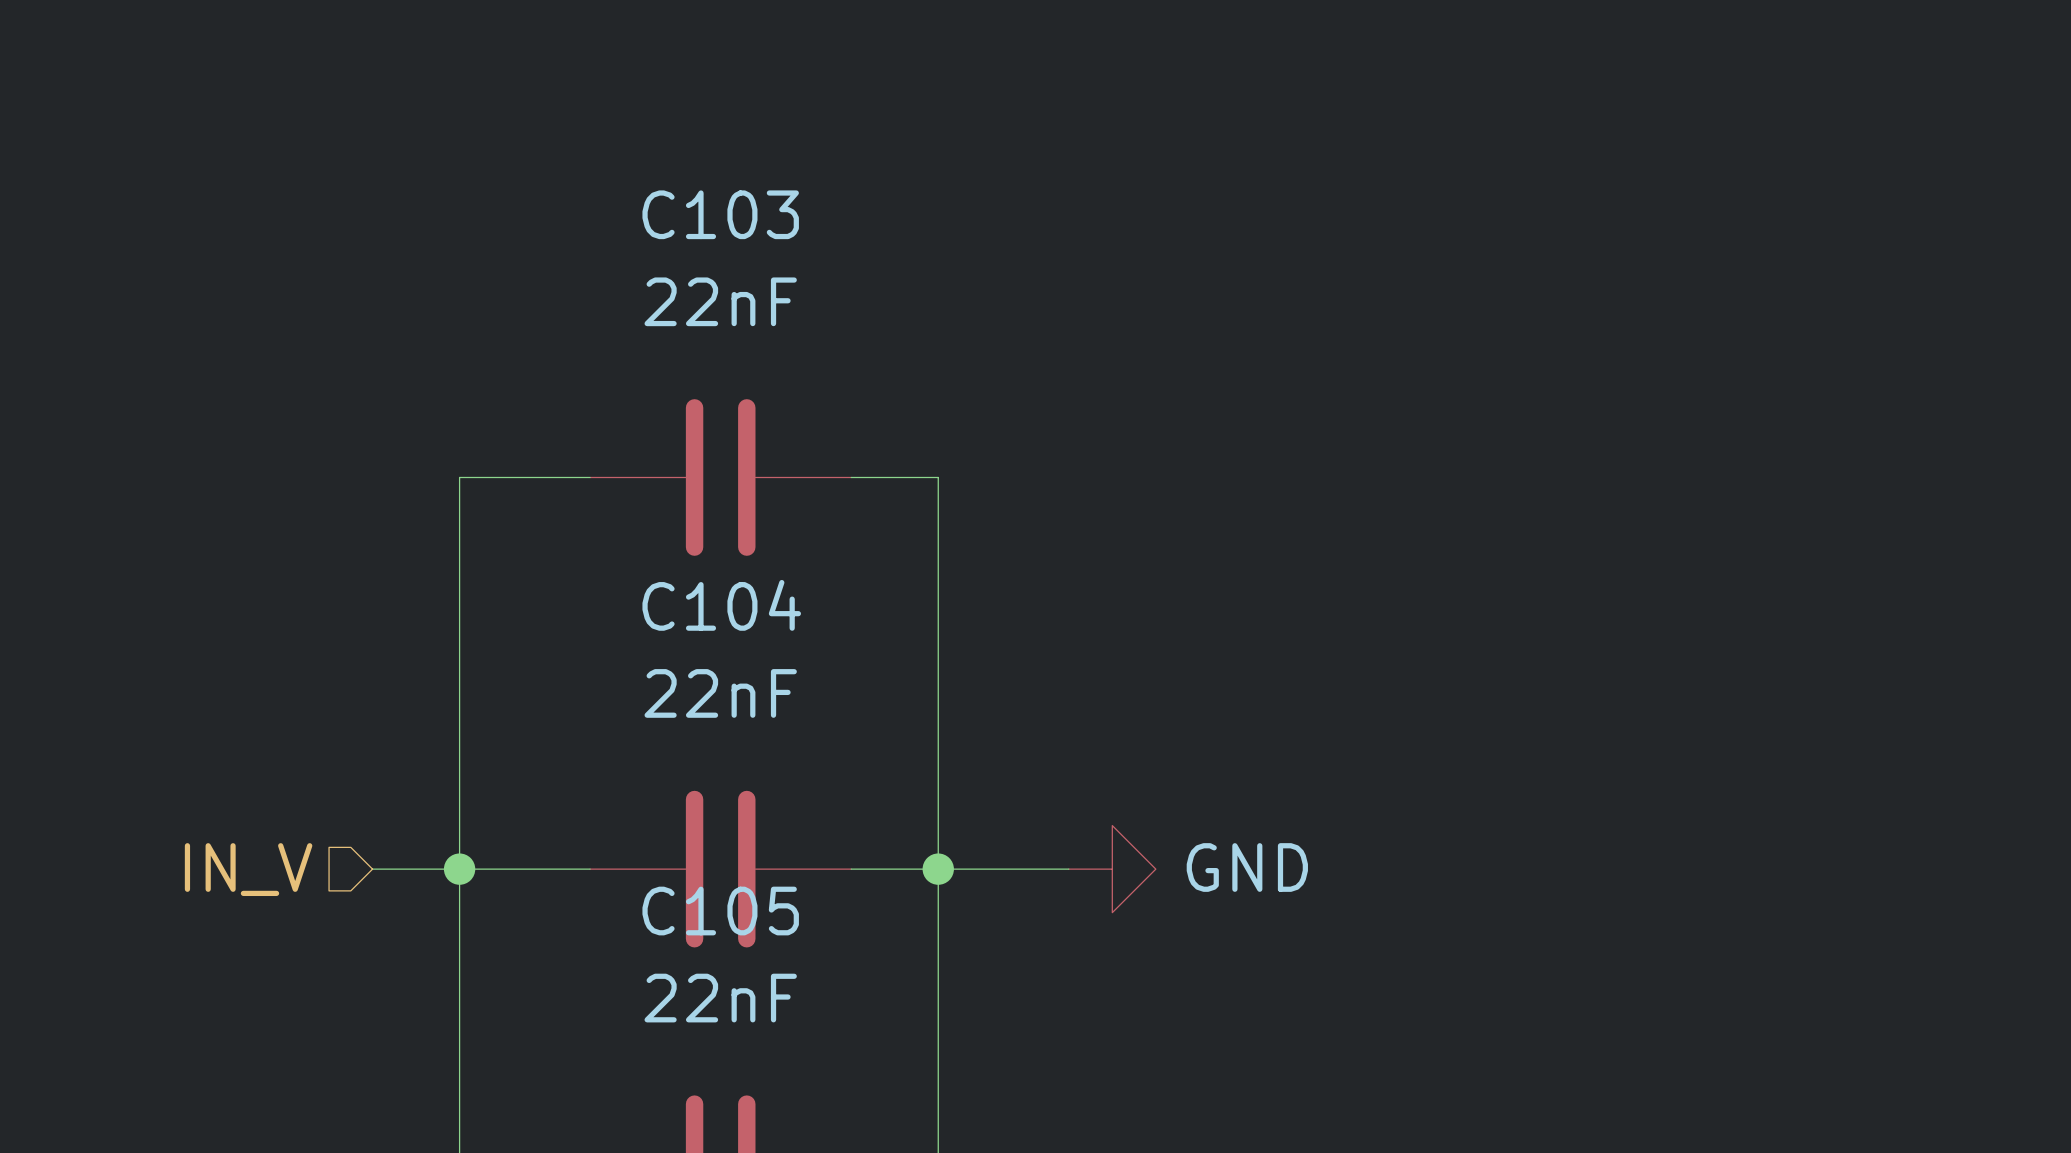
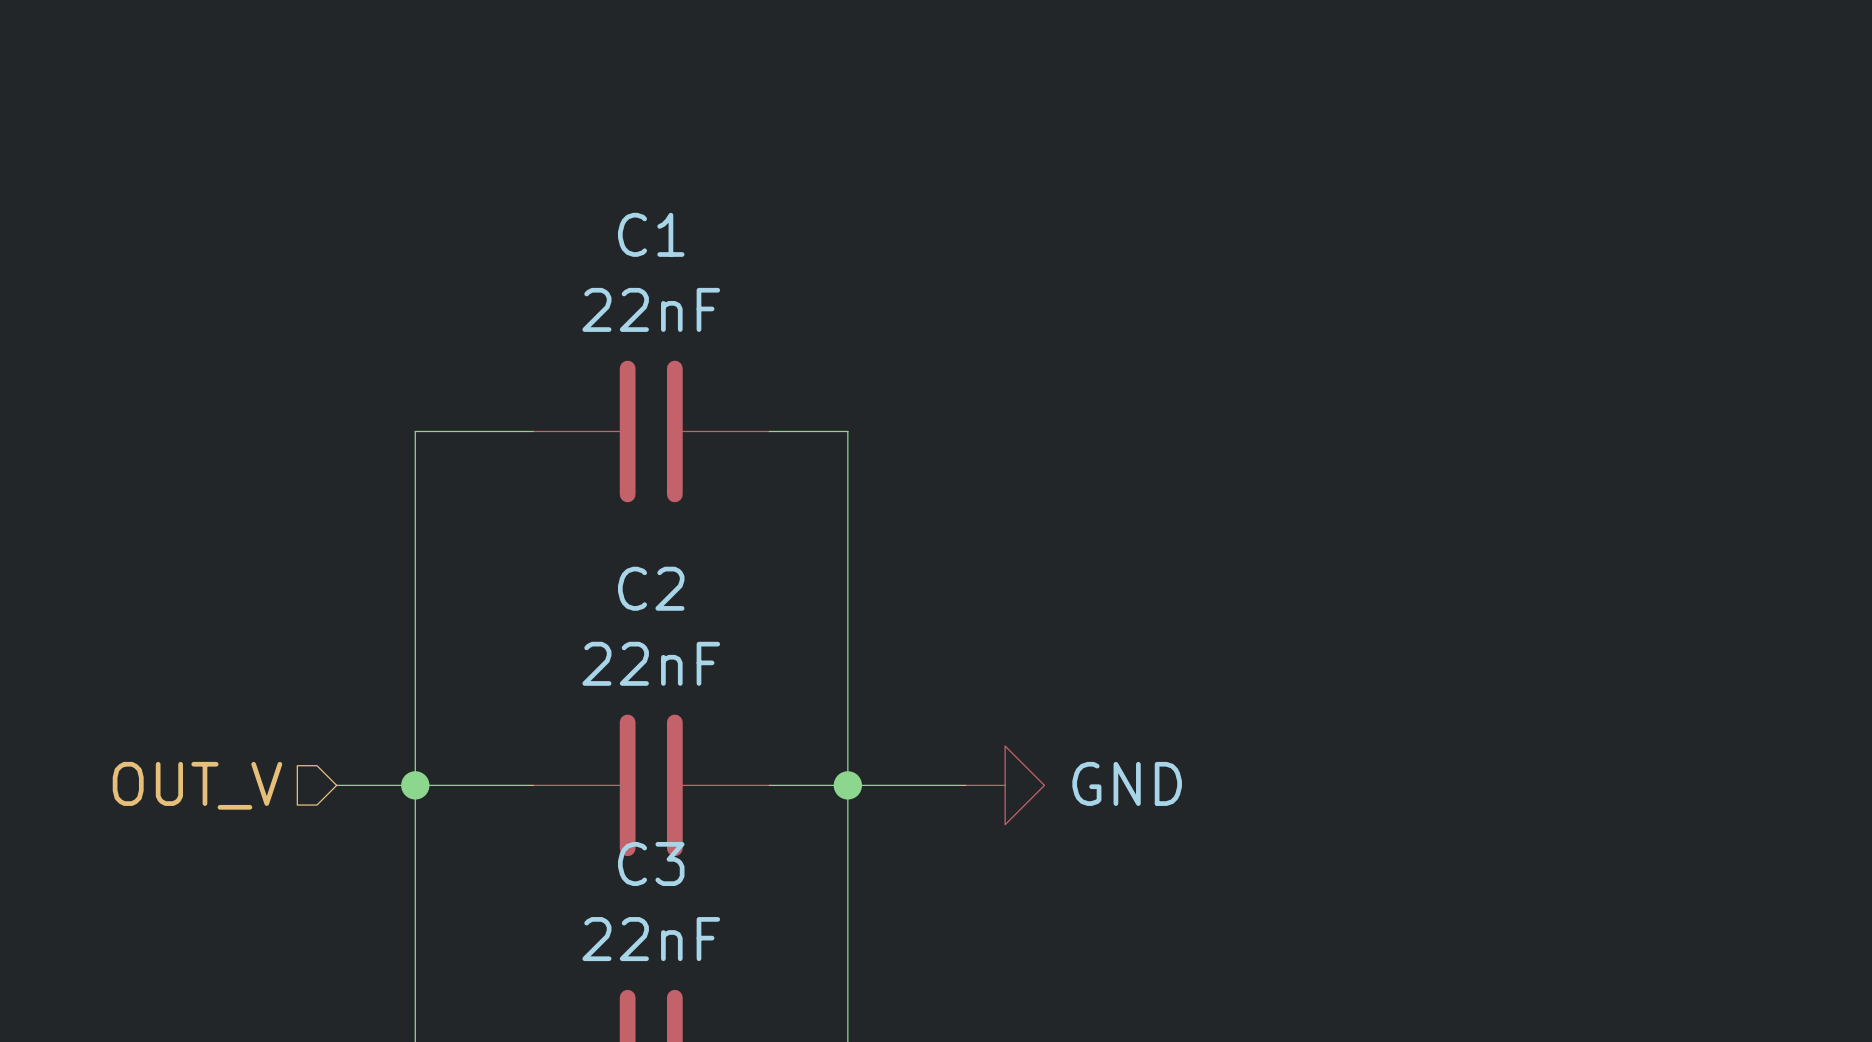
C103 name: C103 (720, 214) -> C1 (651, 234)
C103 value position: 22nF (720, 301) -> 22nF (651, 309)
C104 name: C104 (721, 605) -> C2 (651, 588)
C104 value position: 22nF (720, 693) -> 22nF (651, 663)
hierarchical label: IN_V (248, 869) -> OUT_V (197, 785)
C105 name: C105 (720, 911) -> C3 (651, 863)
C105 value position: 22nF (720, 998) -> 22nF (651, 939)

